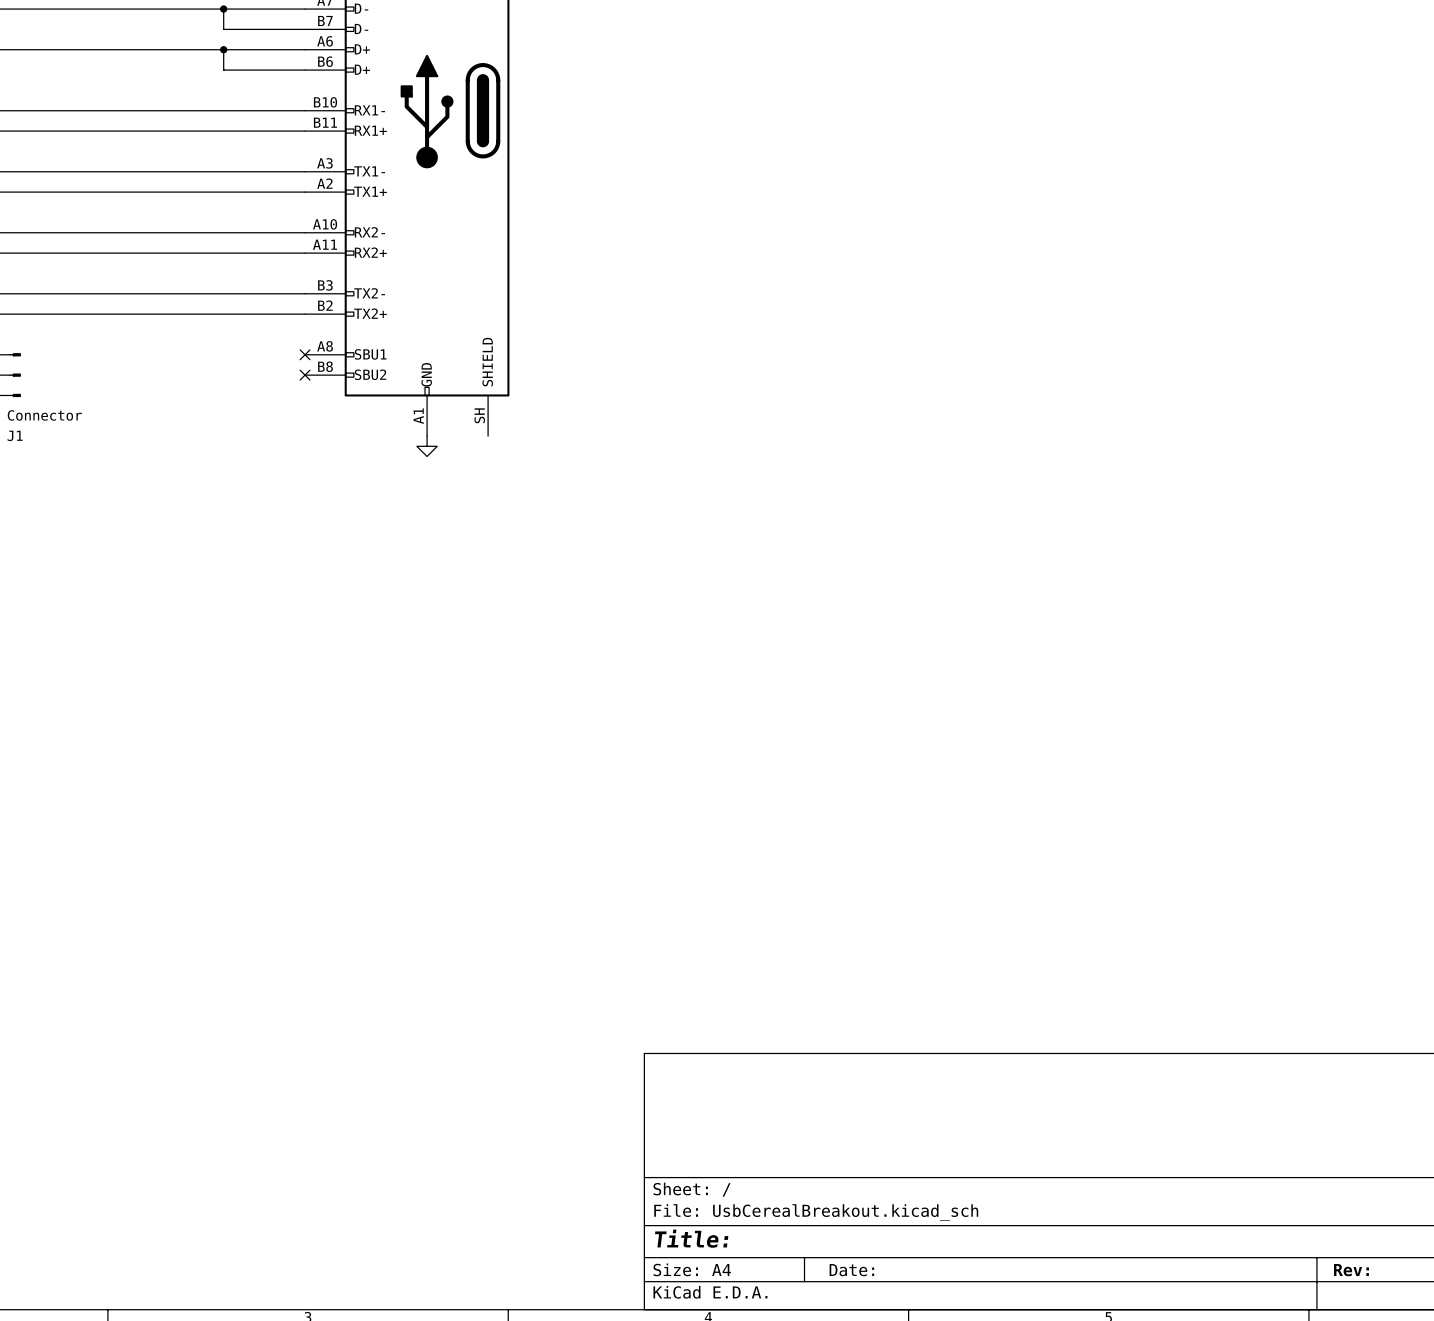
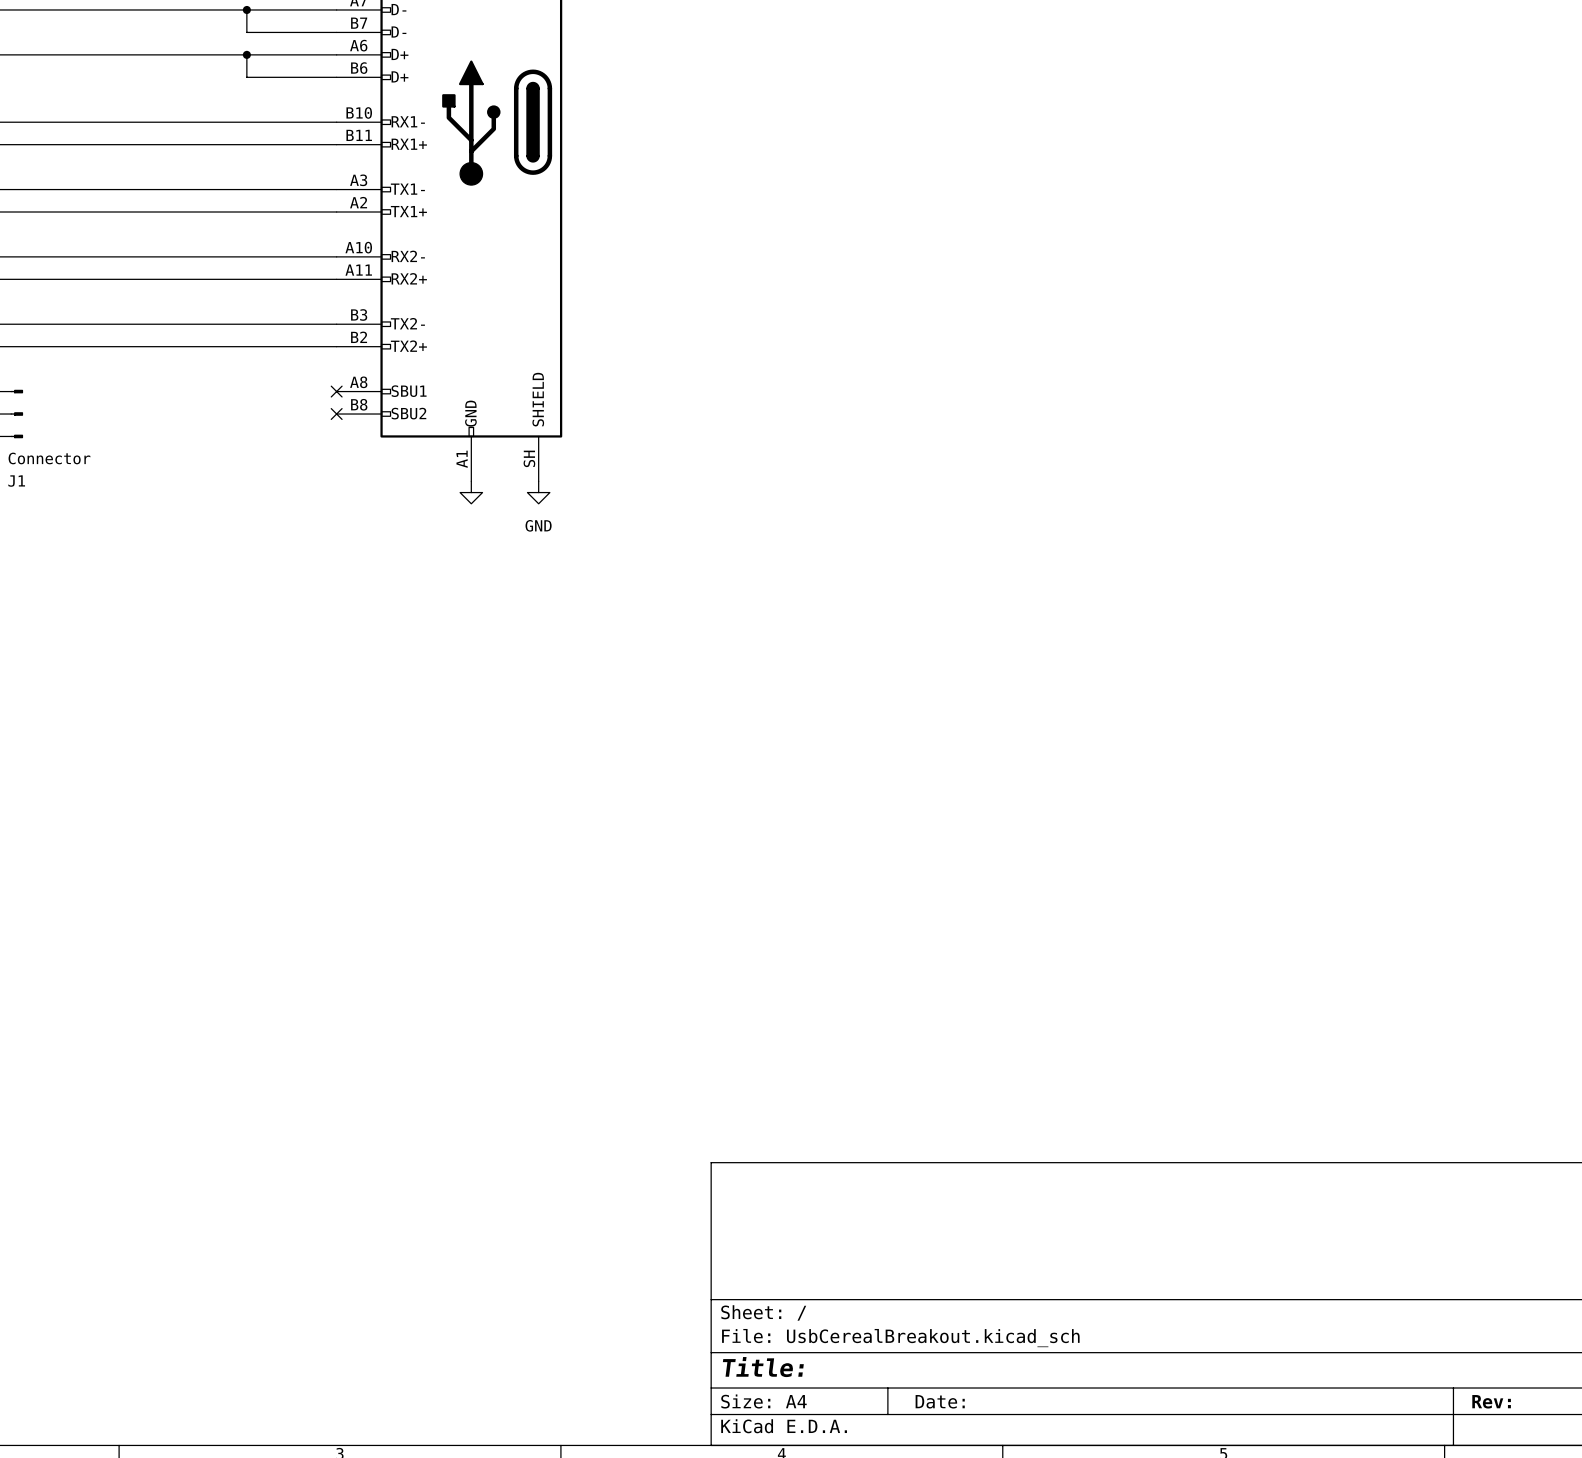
power symbol: none -> GND (538, 492)

